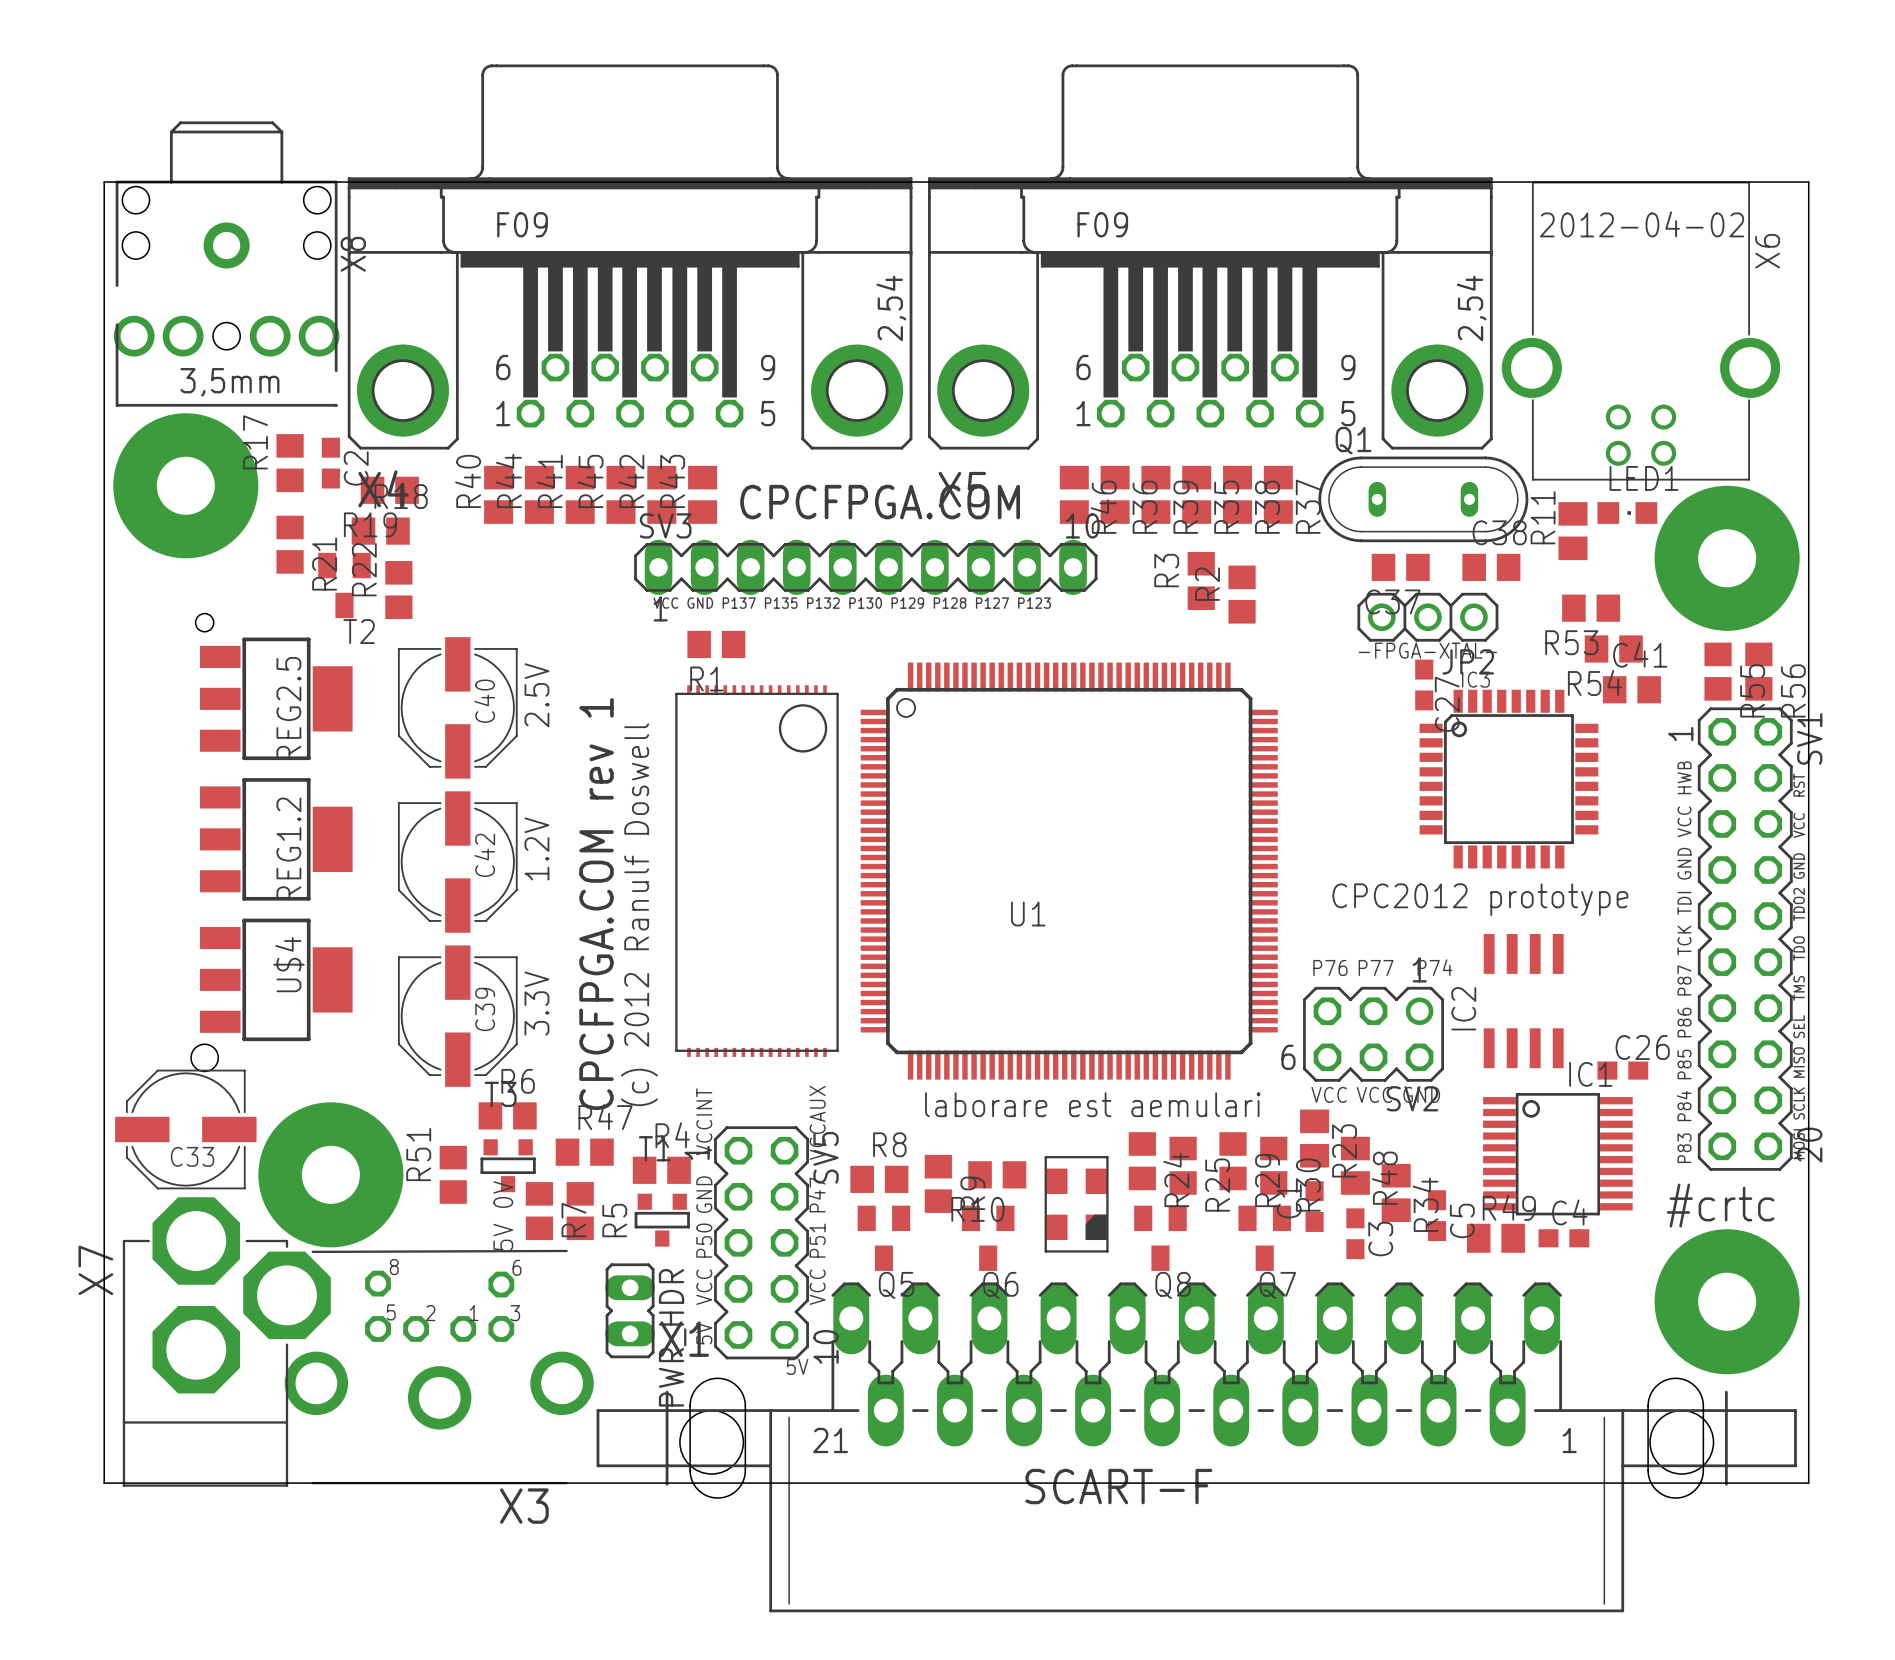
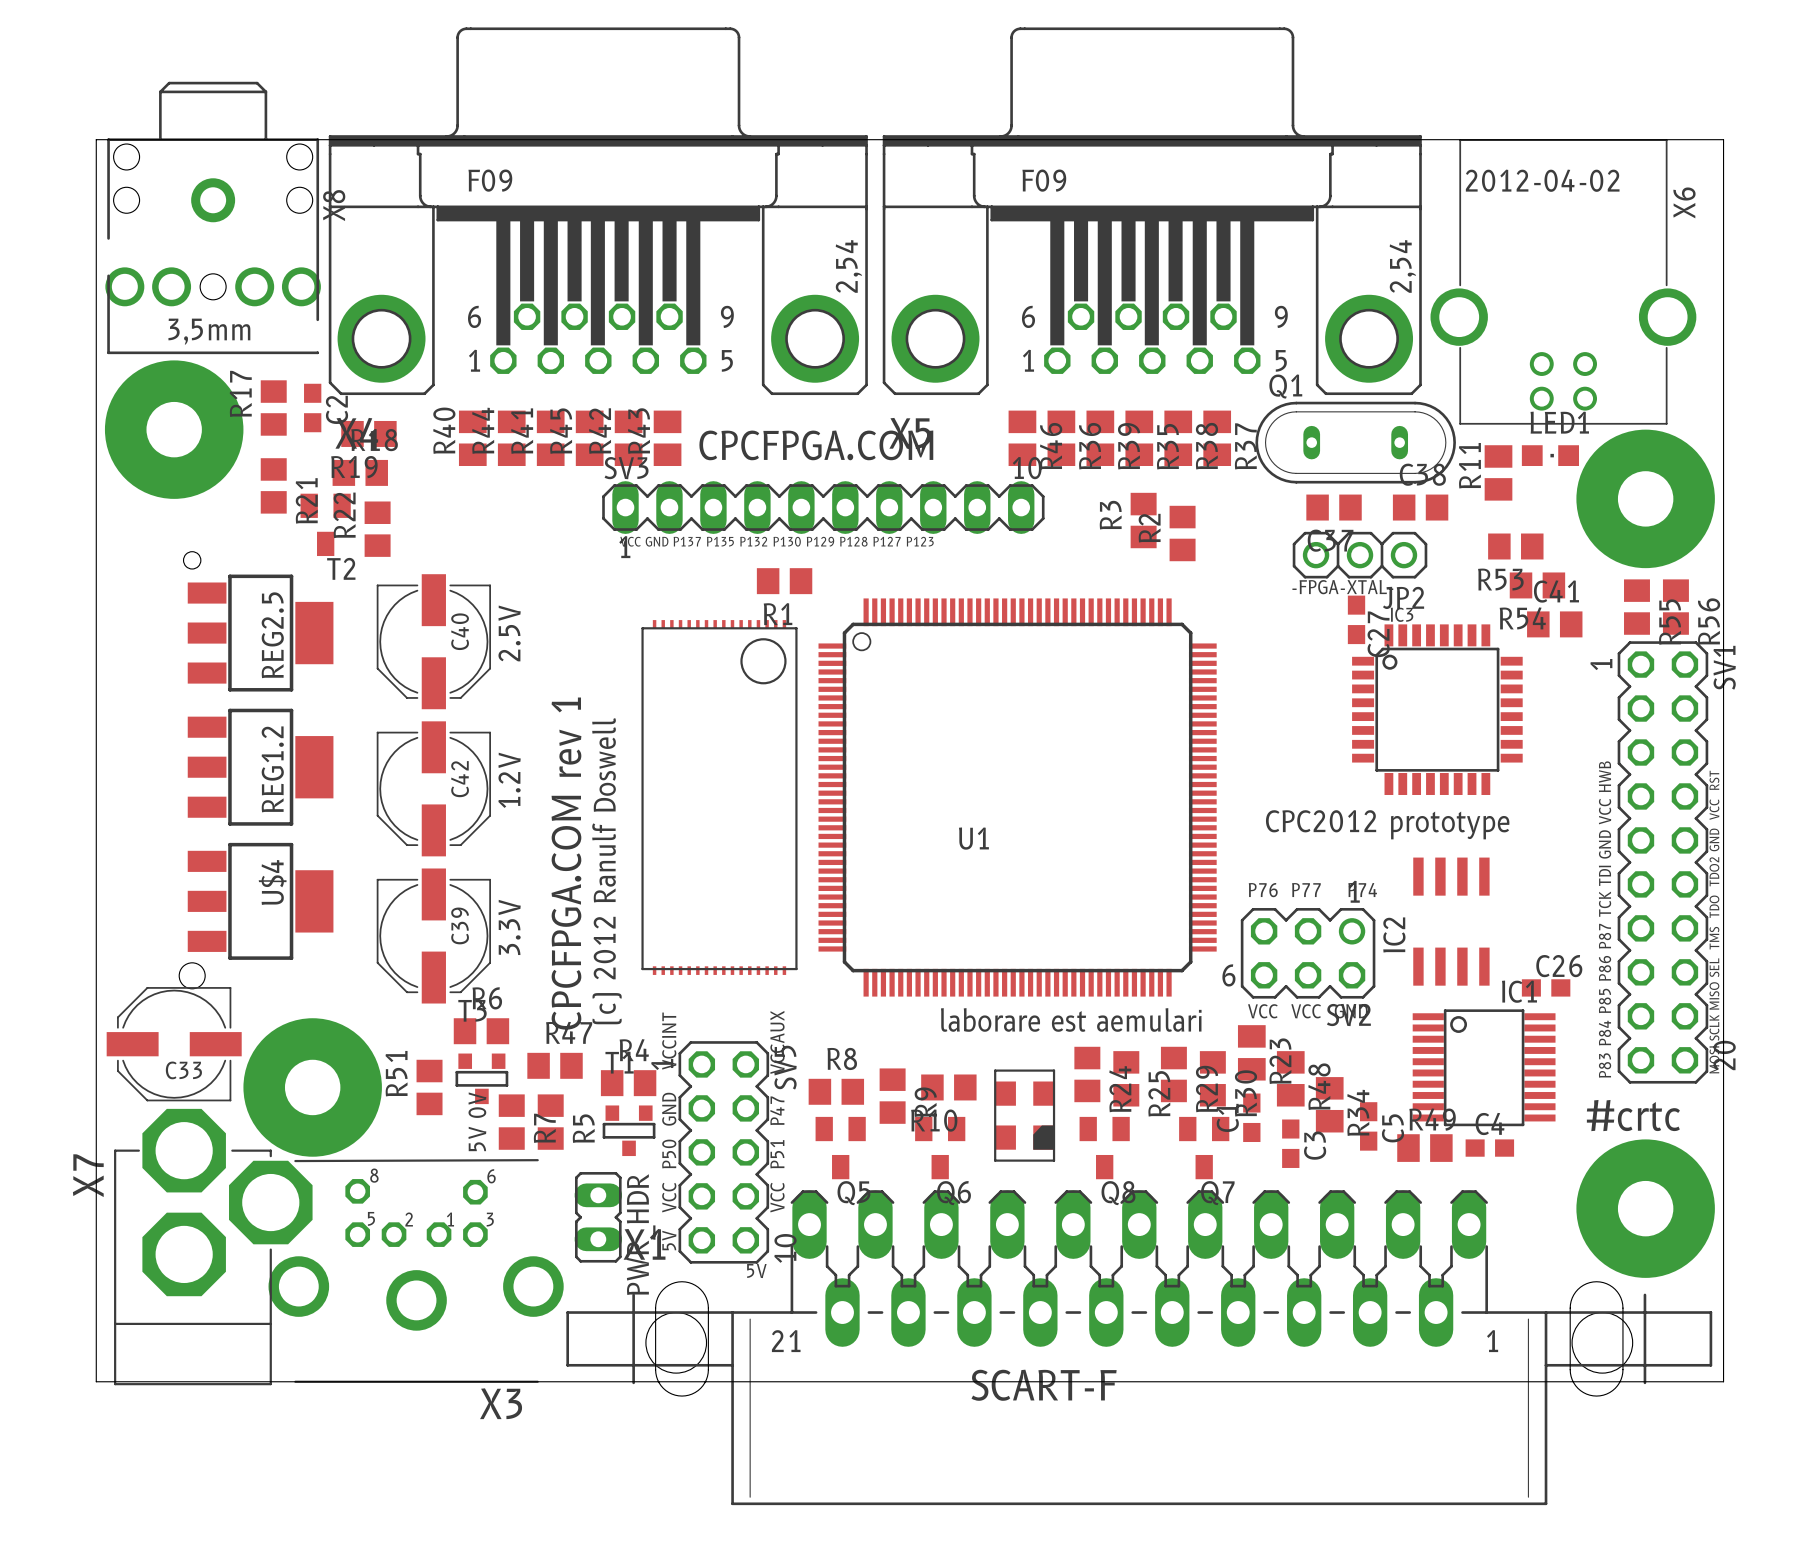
R1 position: (716, 644) -> (784, 581)

